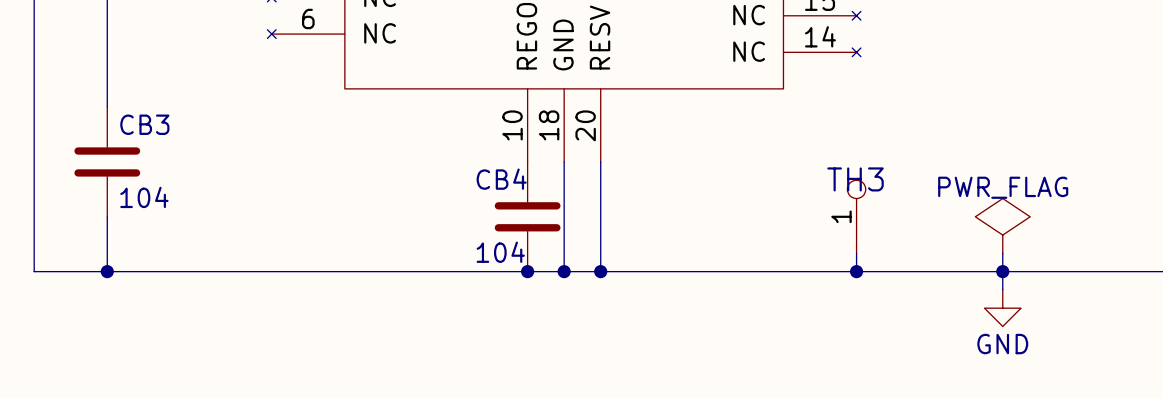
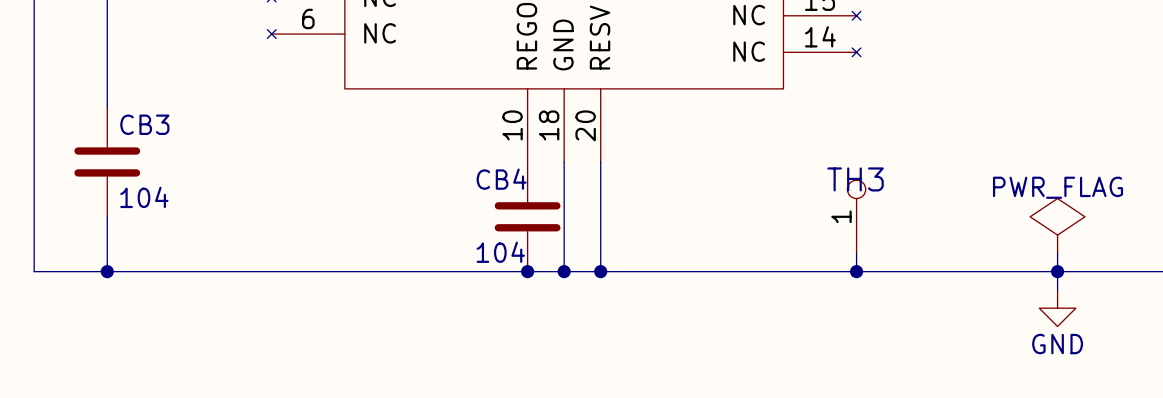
power symbol position: PWR_FLAG (1002, 225) -> PWR_FLAG (1057, 225)
wire: (1002, 253) (1002, 289) -> (1057, 253) (1057, 289)
junction position: (1002, 271) -> (1057, 271)
power symbol position: GND (1002, 308) -> GND (1057, 308)

